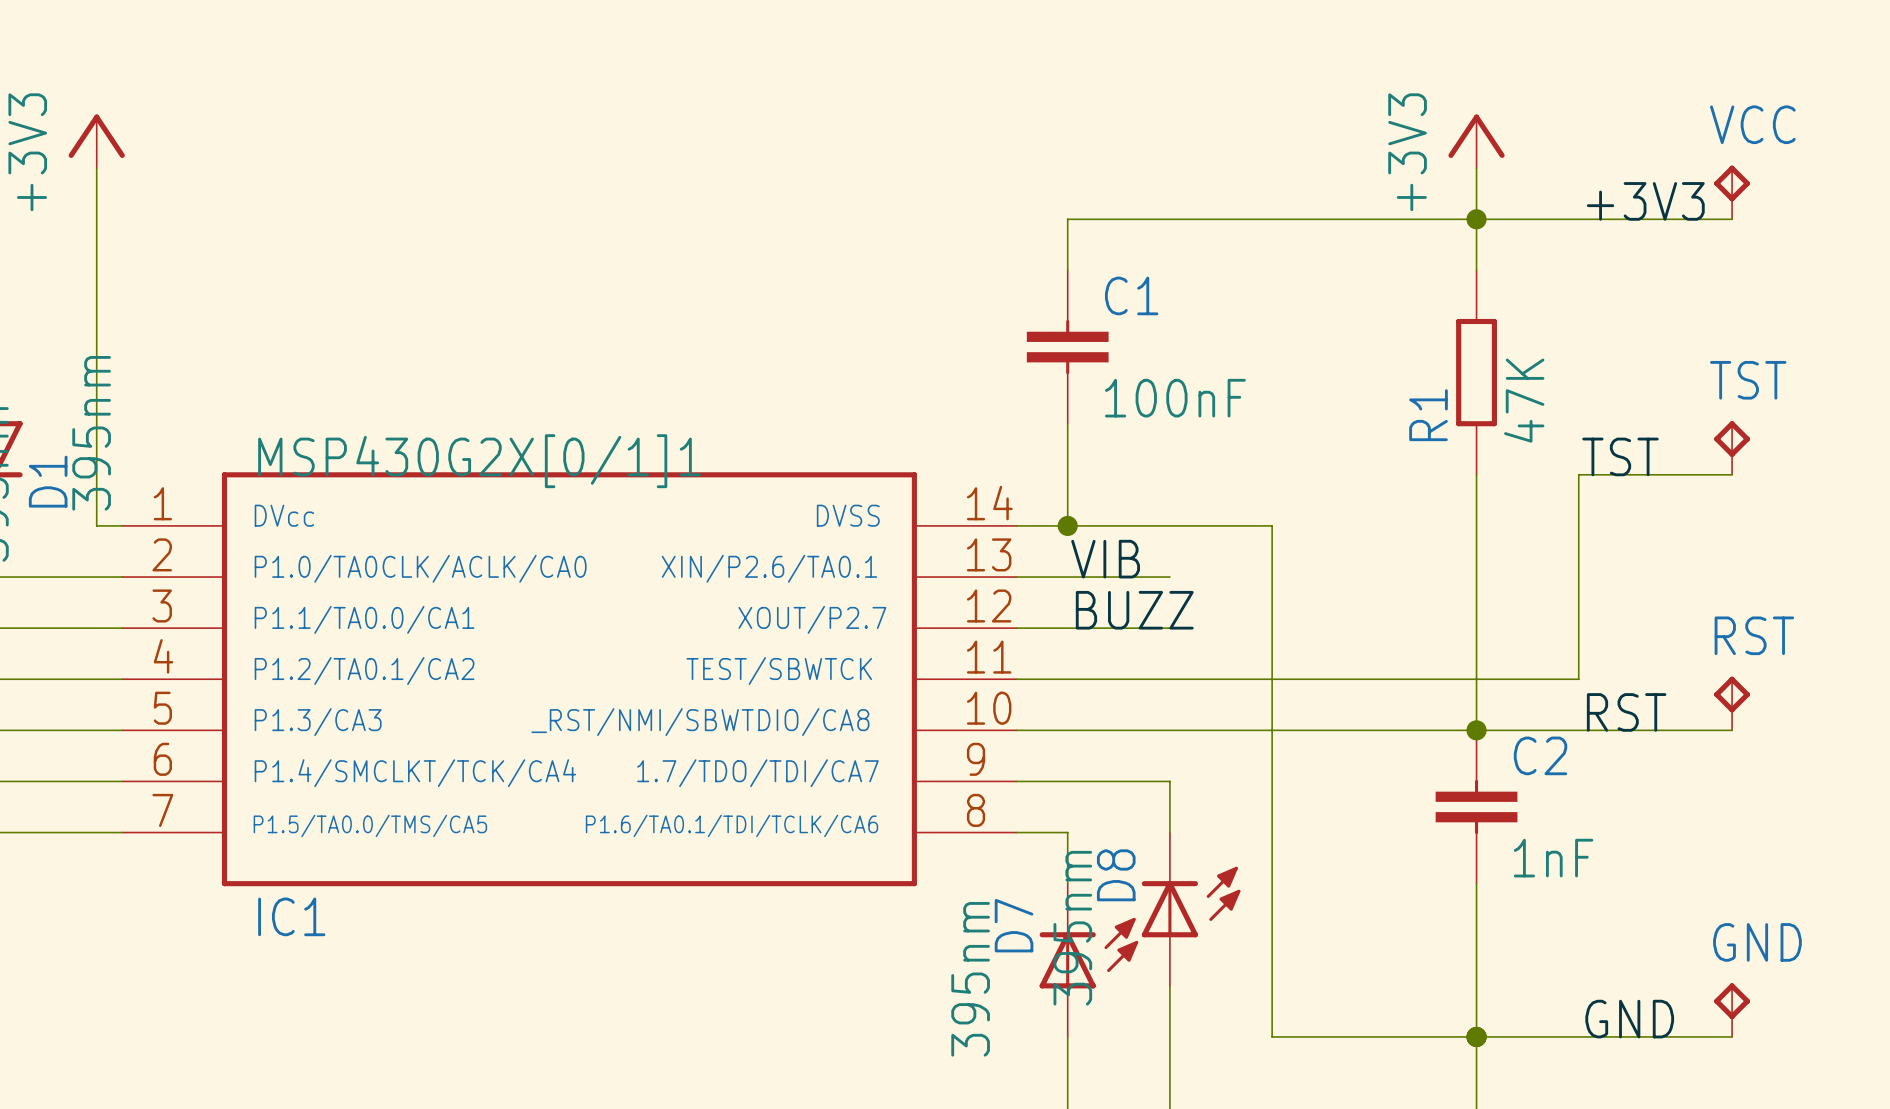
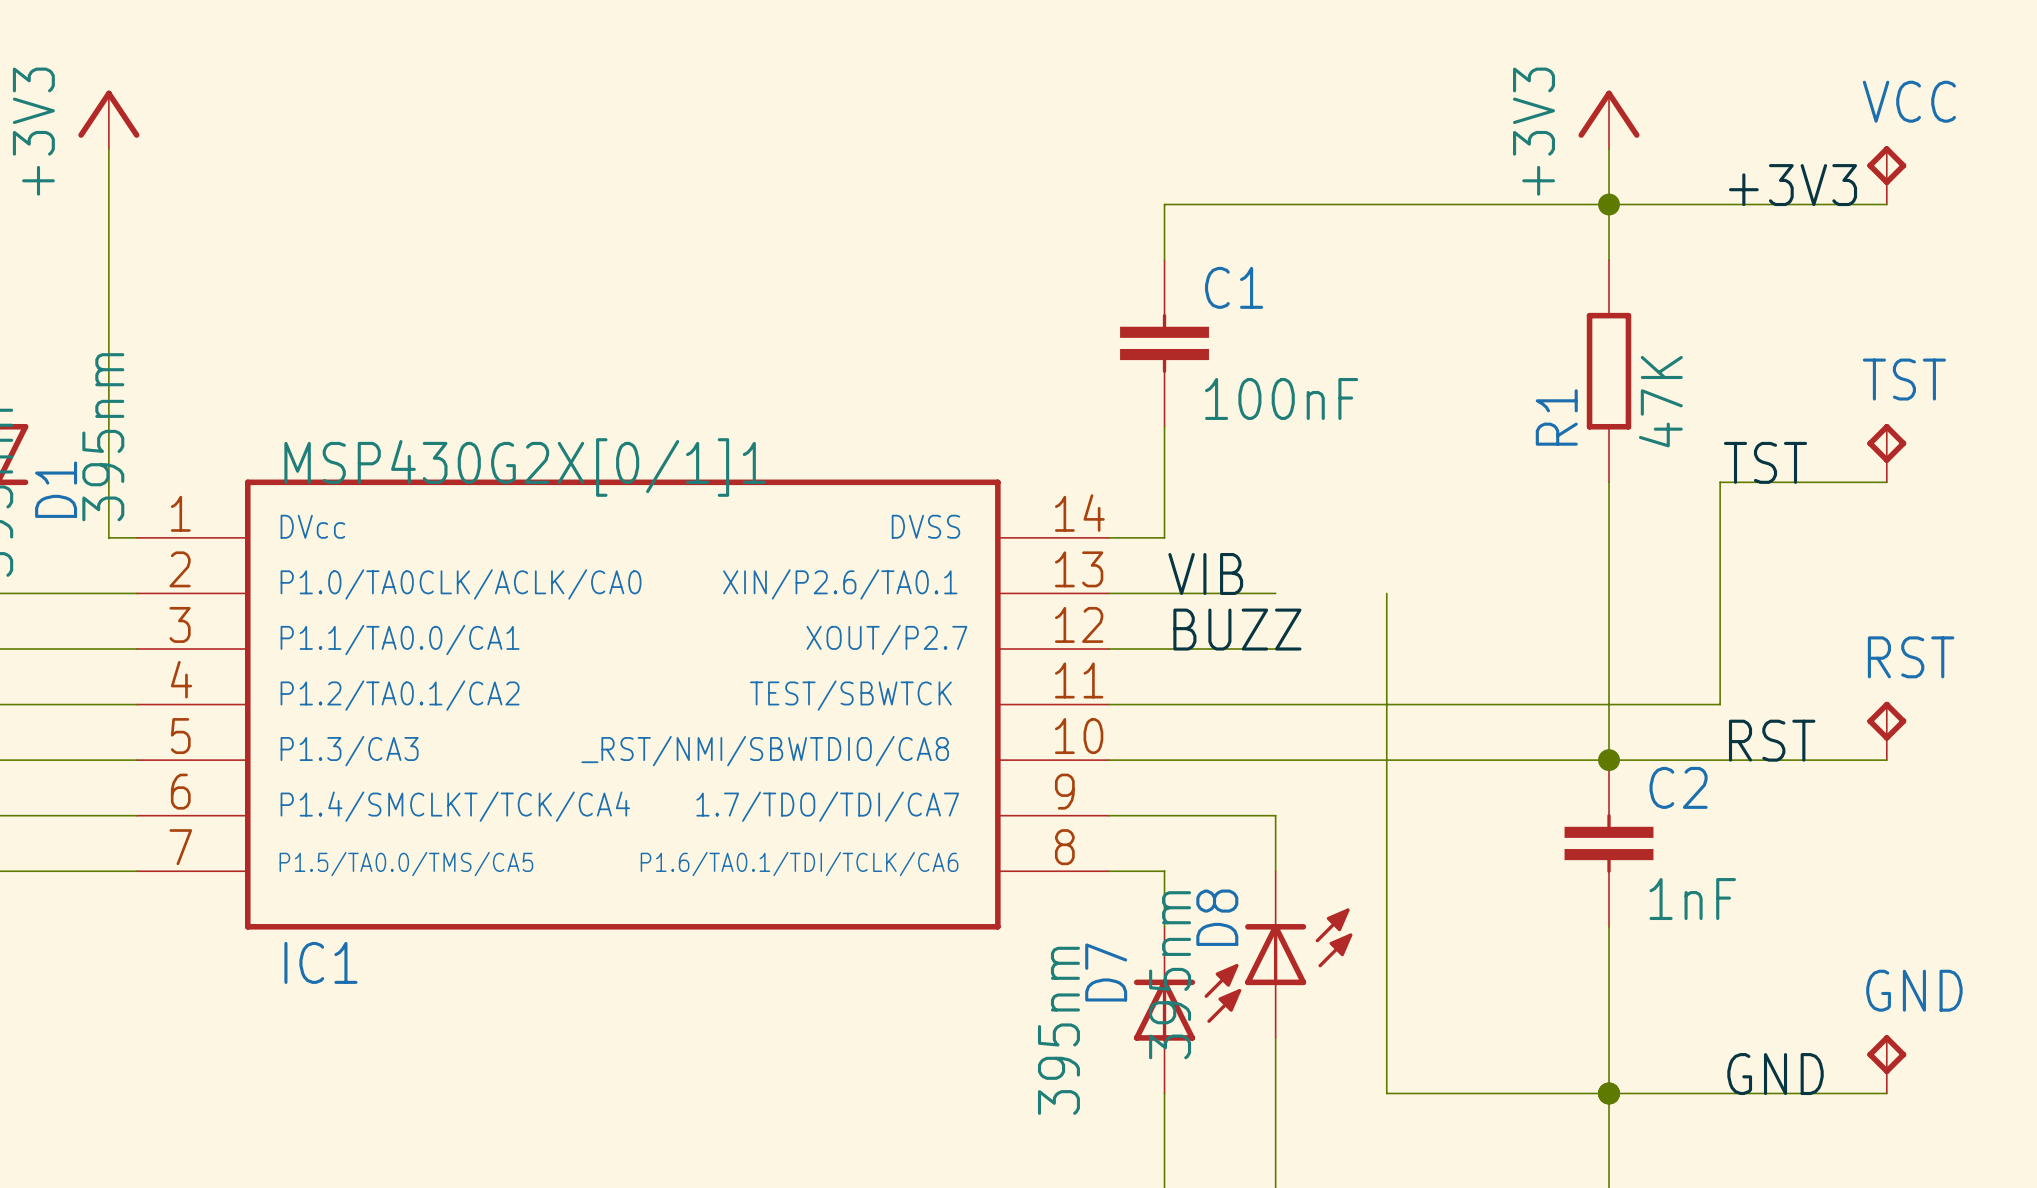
wire: (1067, 525) (1272, 525) (1272, 577) -> none
junction: (1067, 525) -> none

